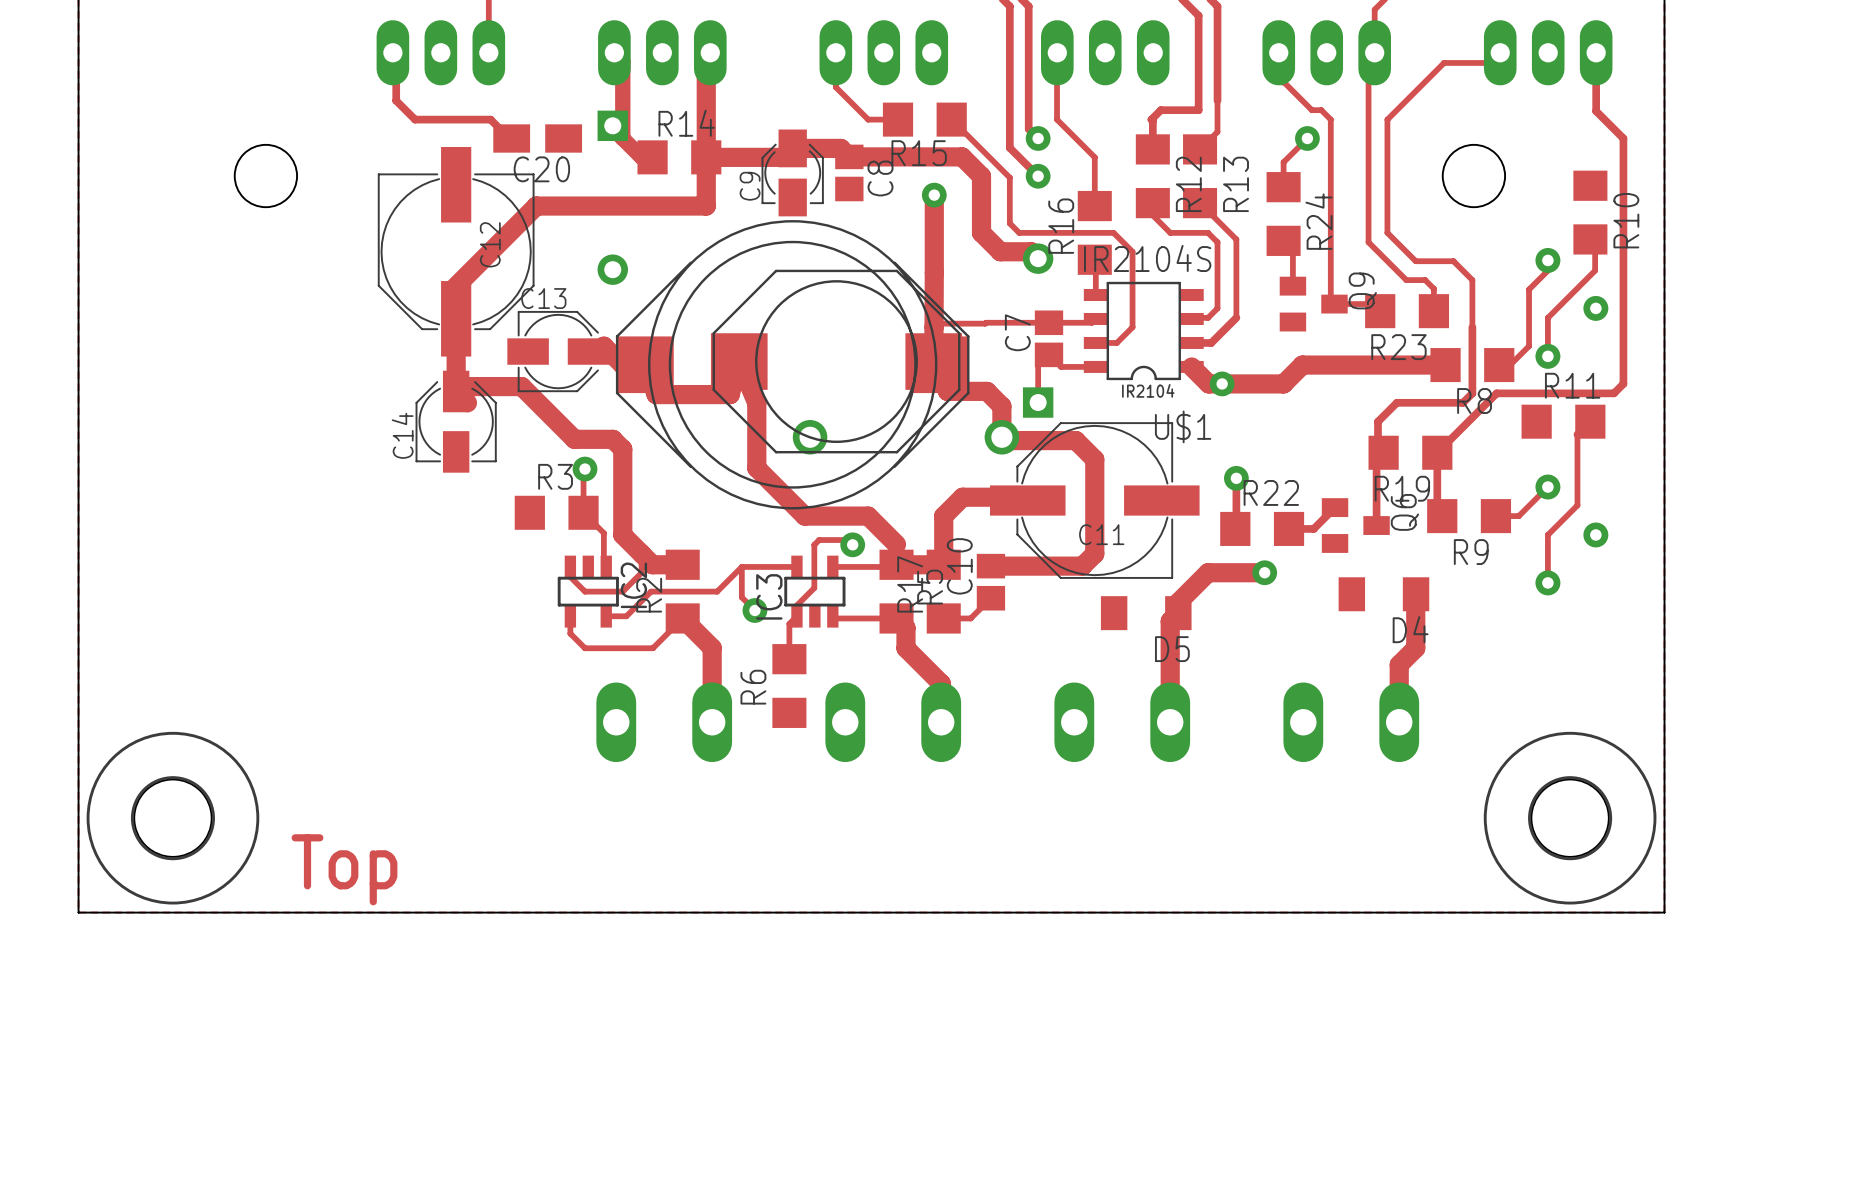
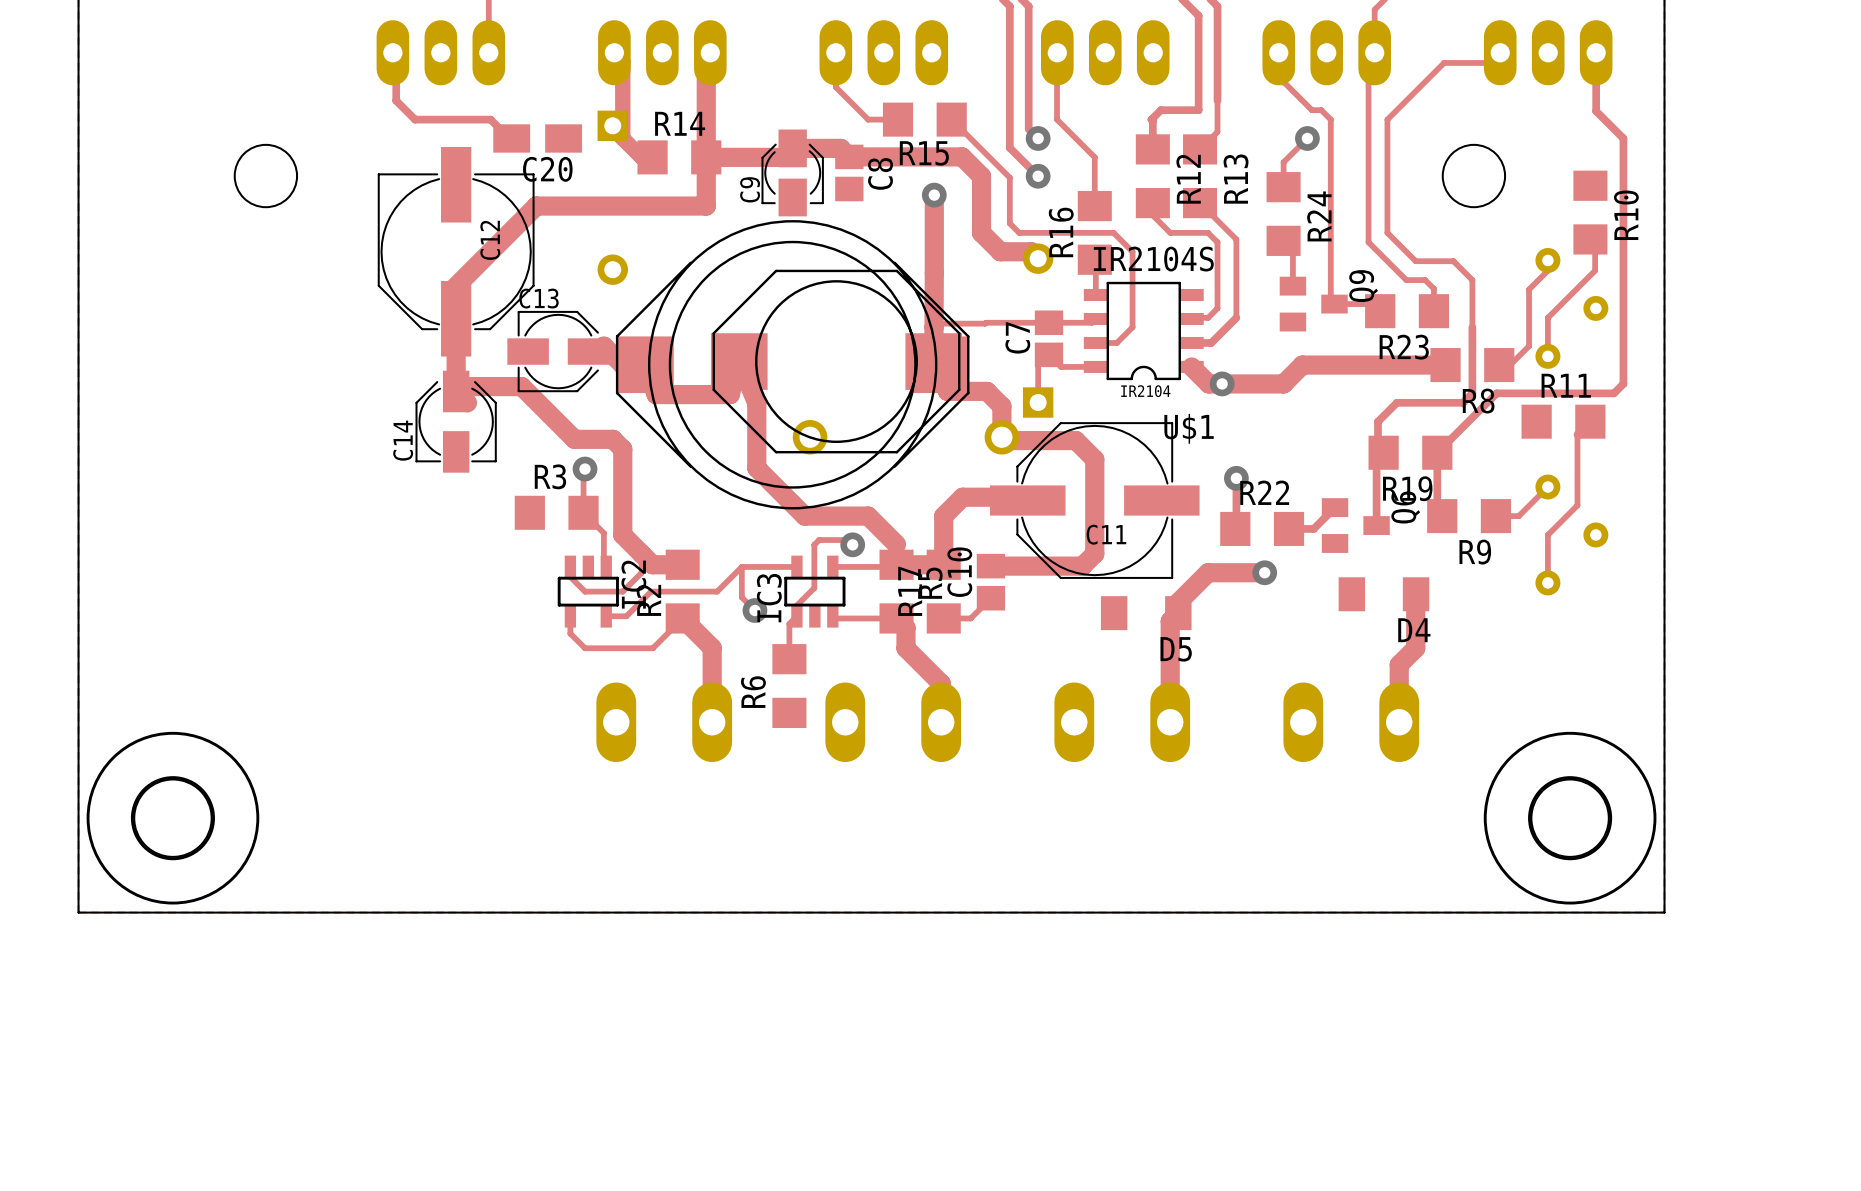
text: Top (344, 869) -> none

